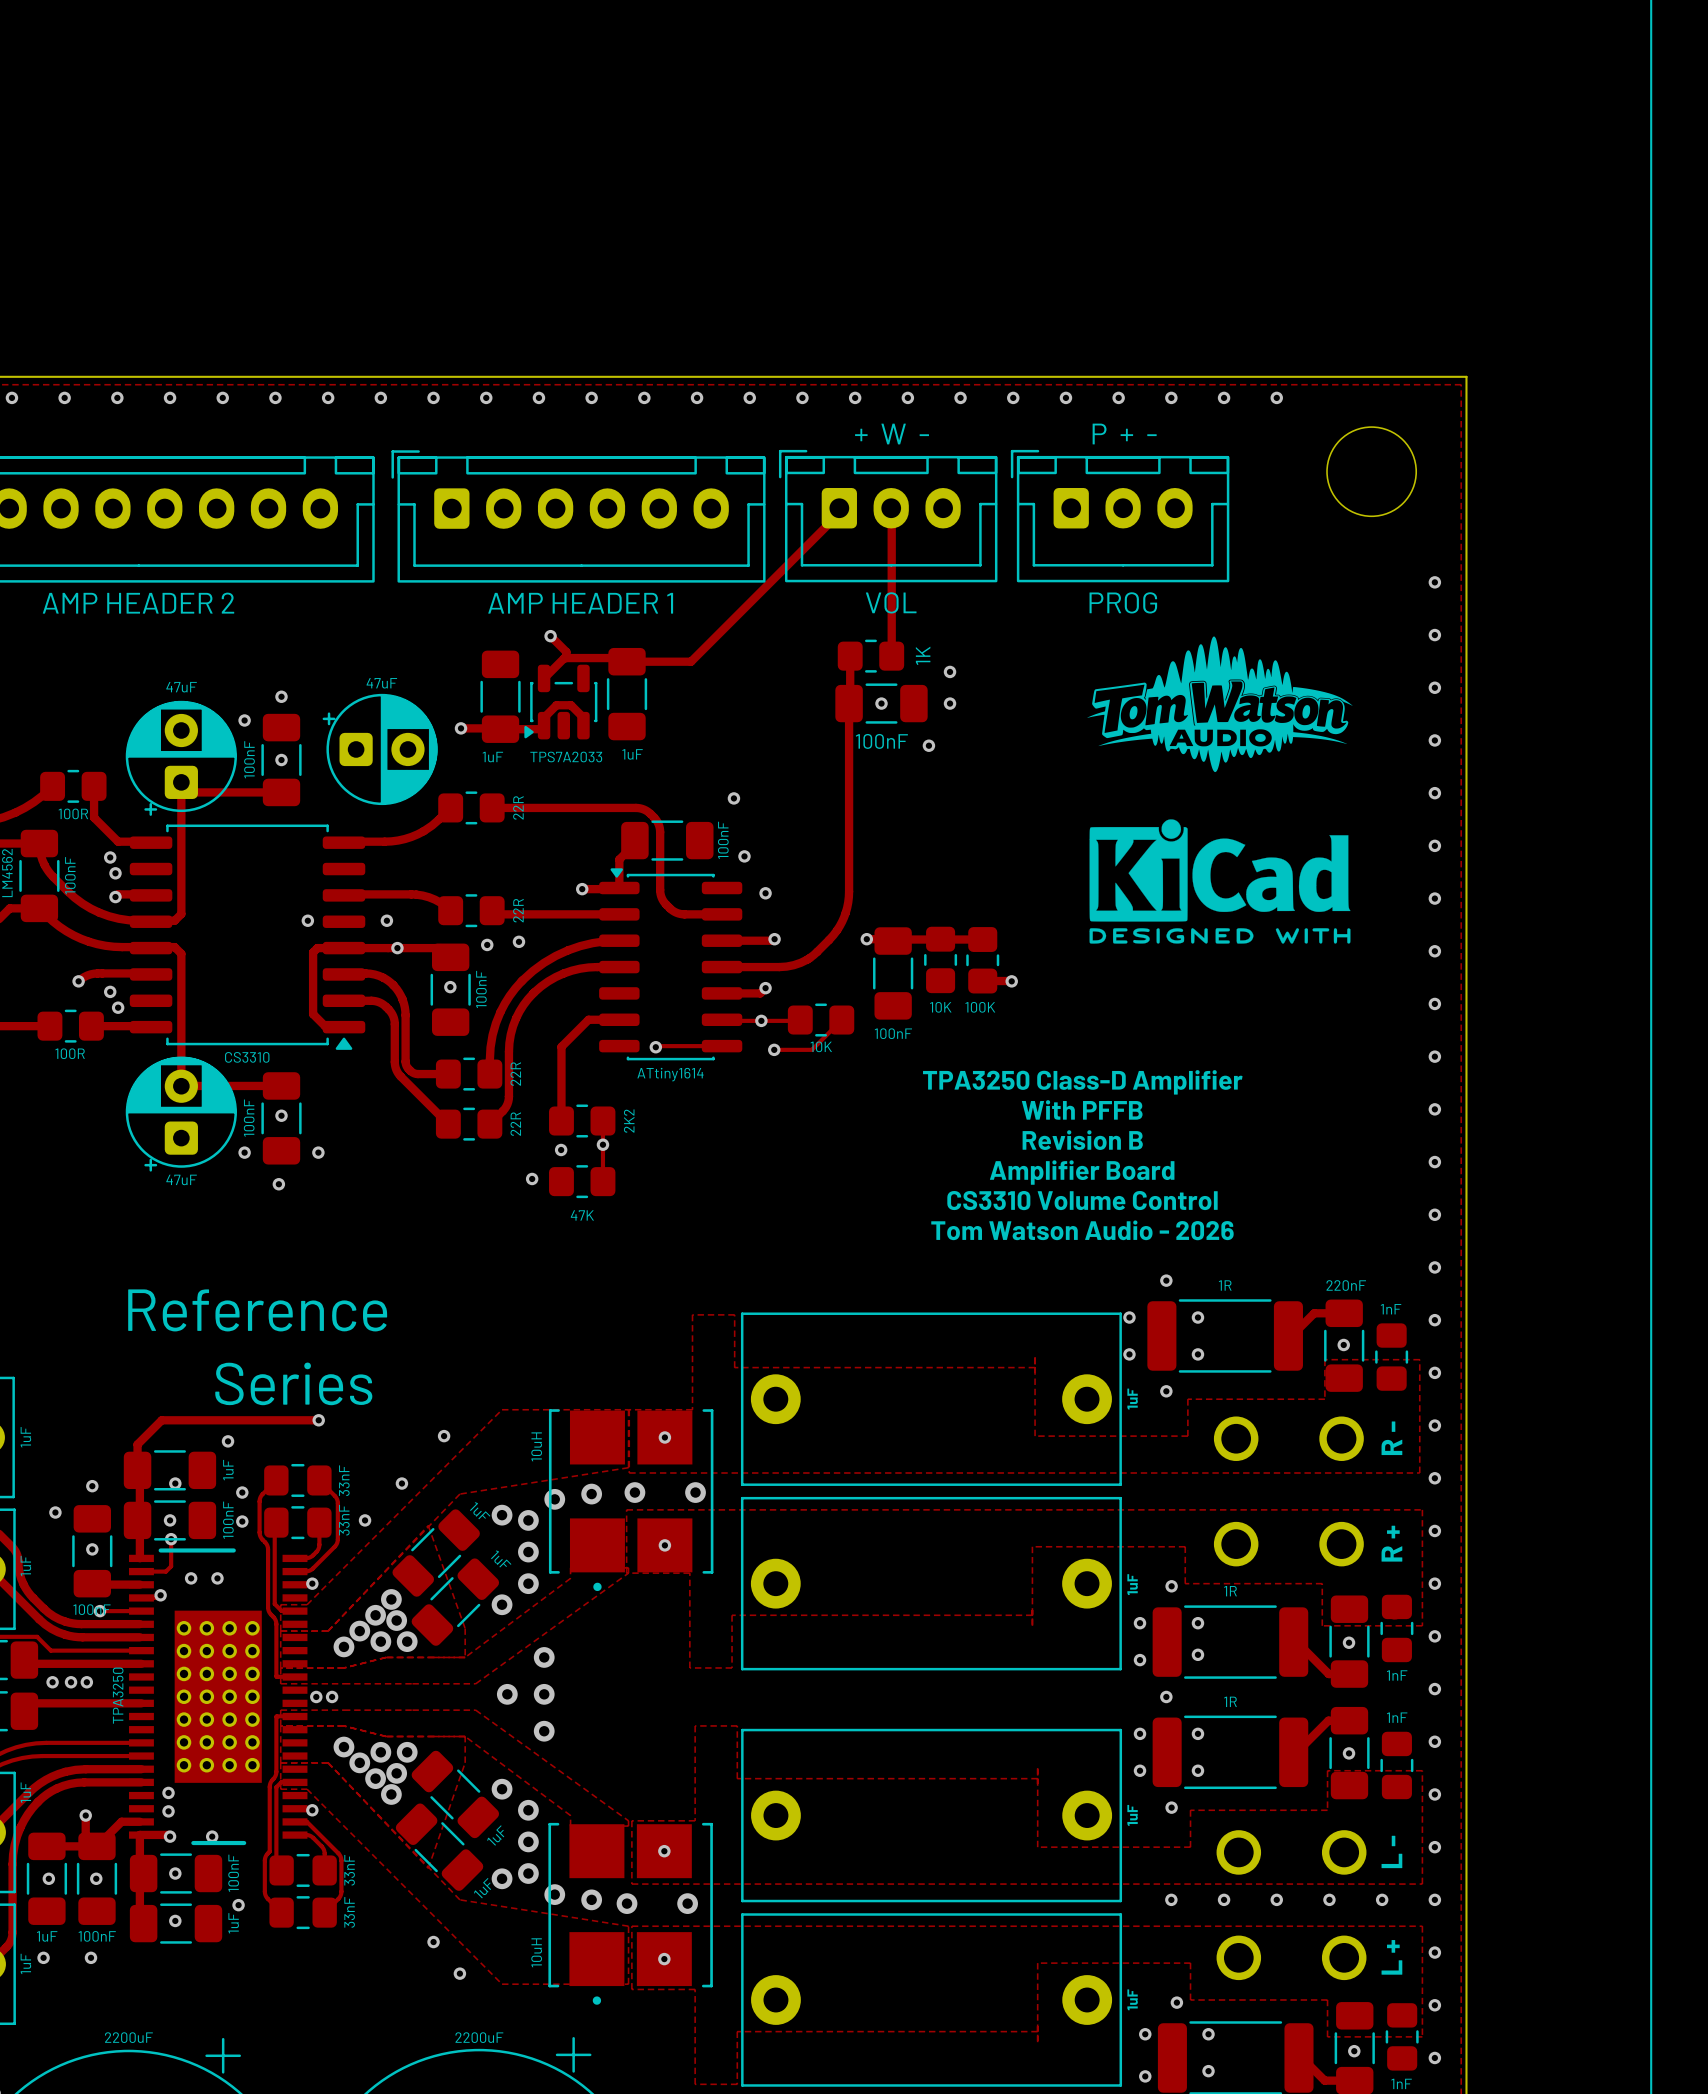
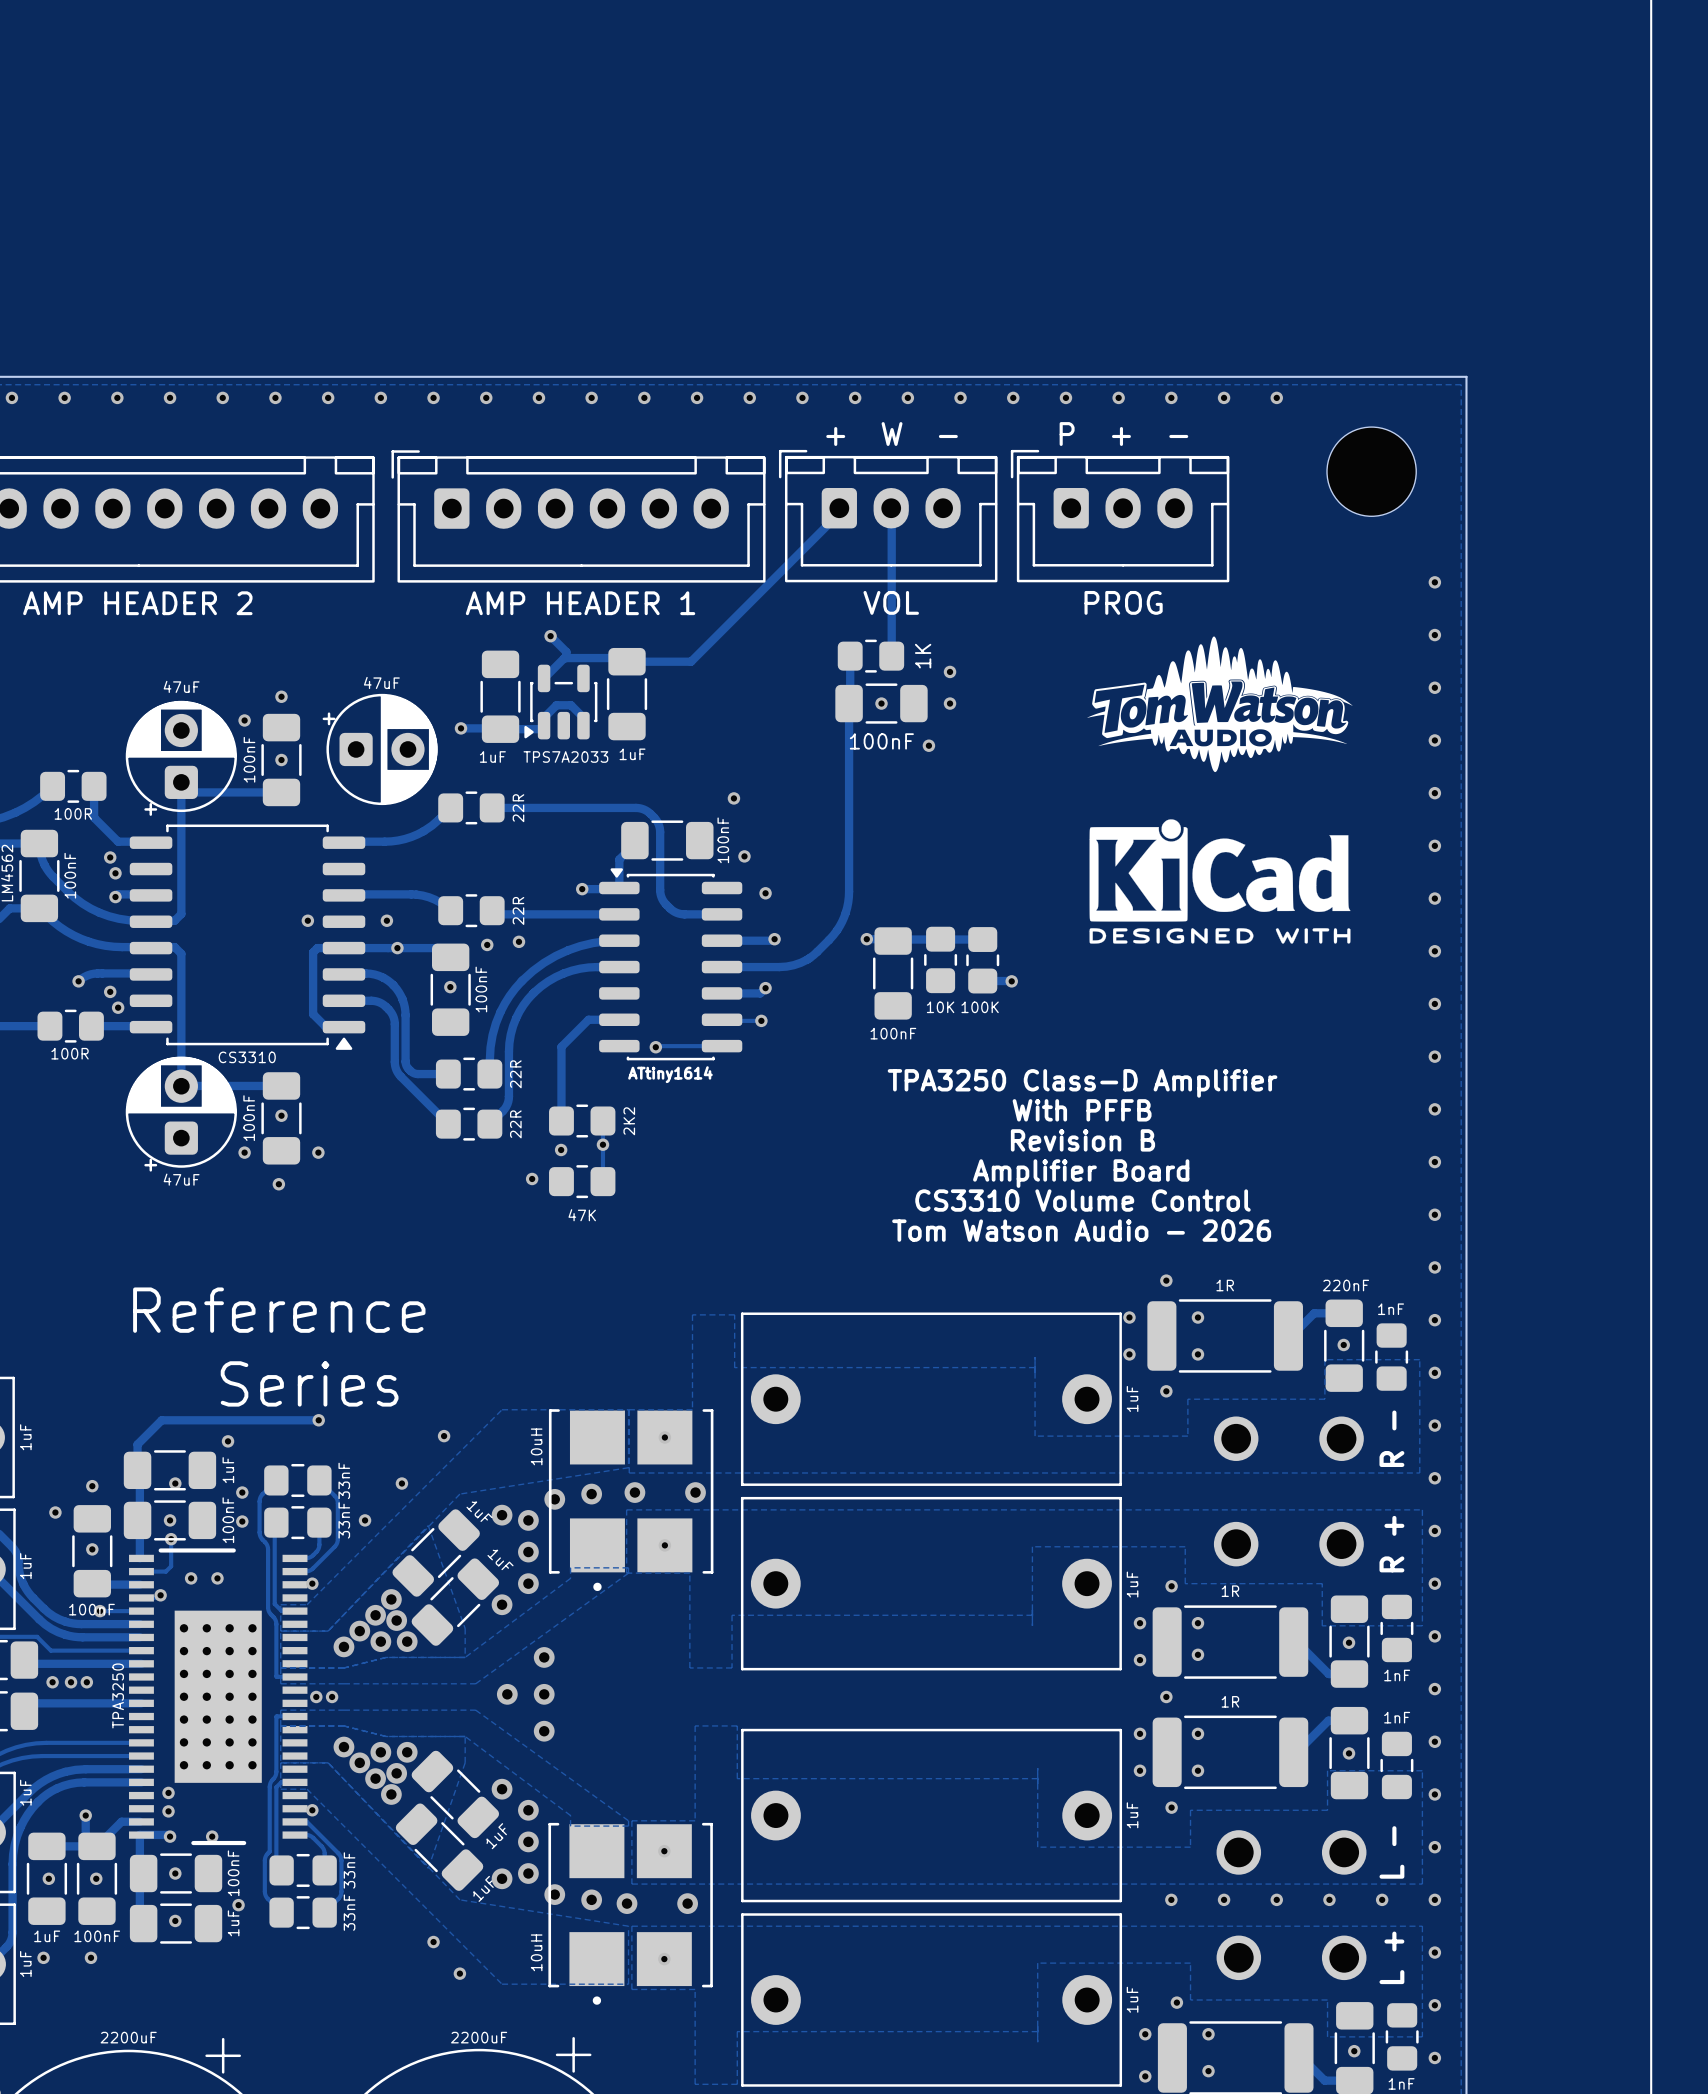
track: (800, 1020) (761, 1020) -> none
part: 10K (821, 1020) -> none
track: (841, 1020) (811, 1049) (774, 1049) -> none
via: (774, 1049) -> none

